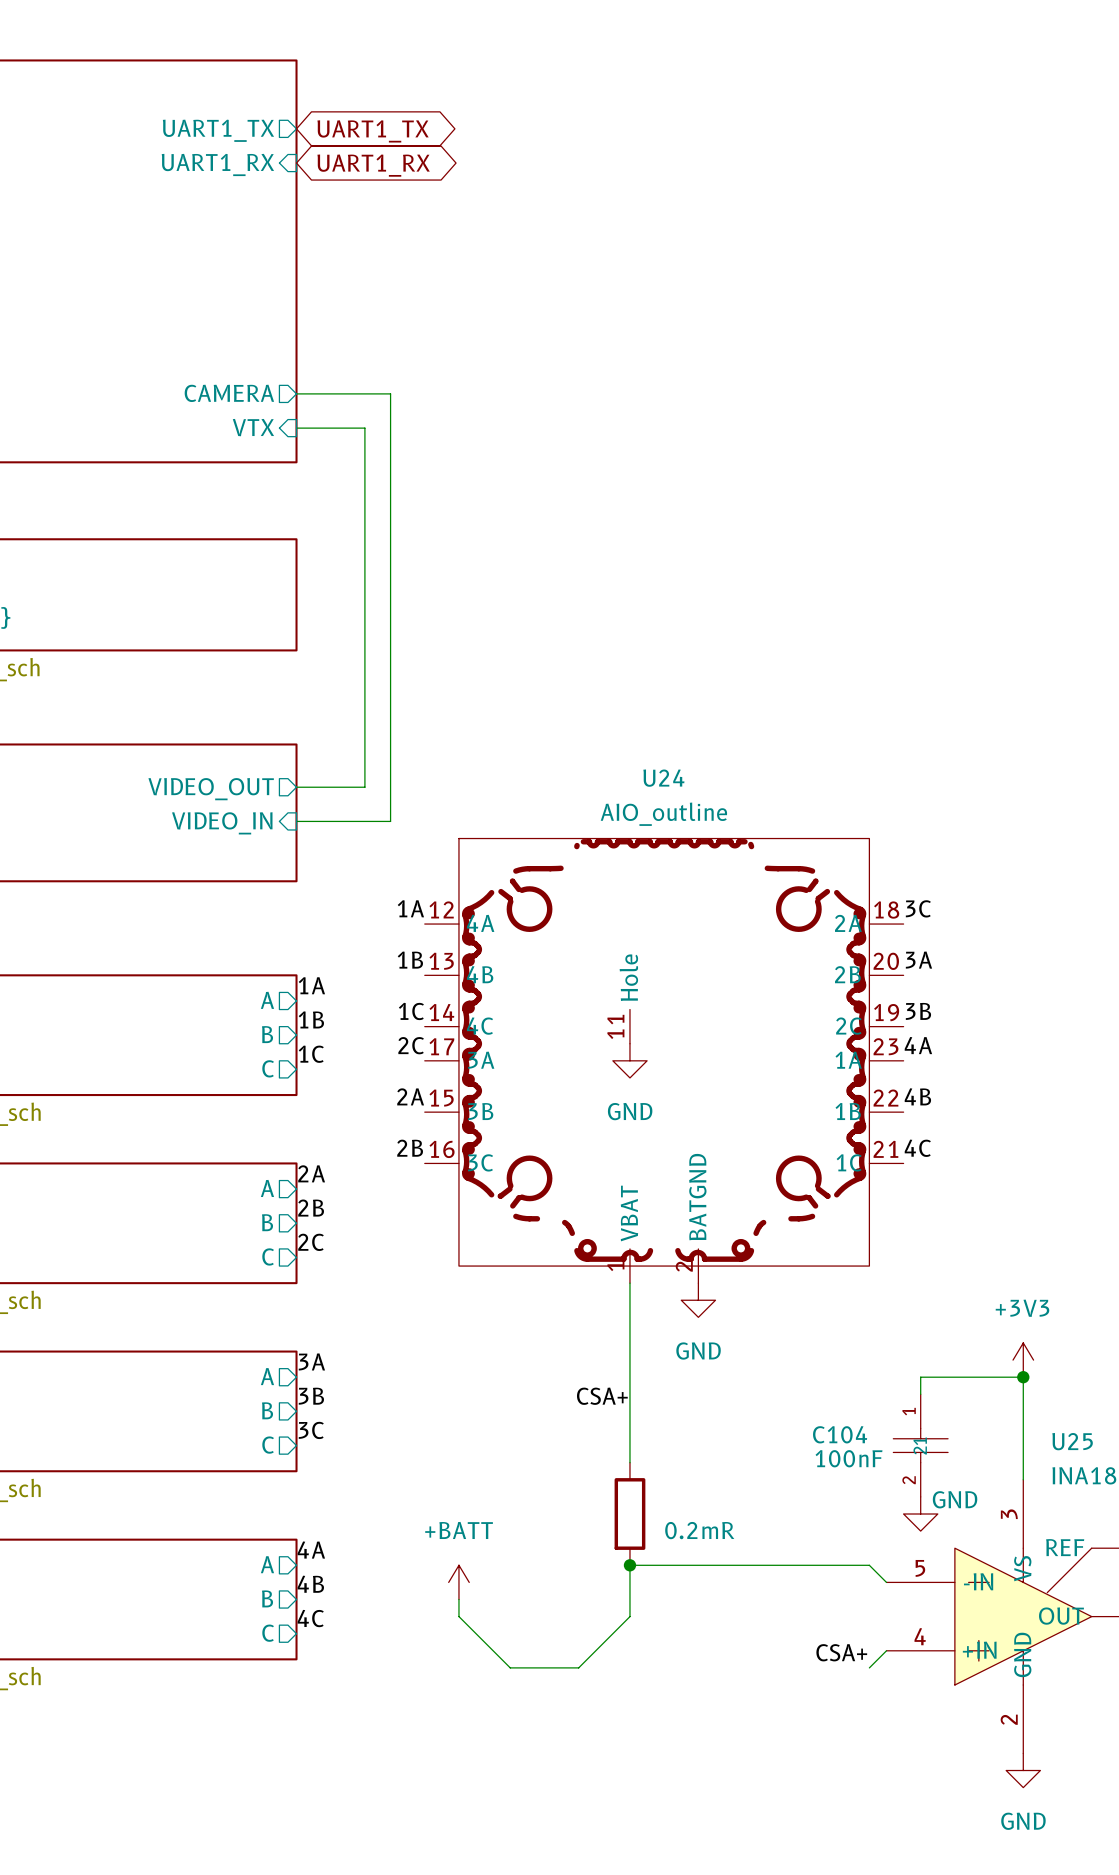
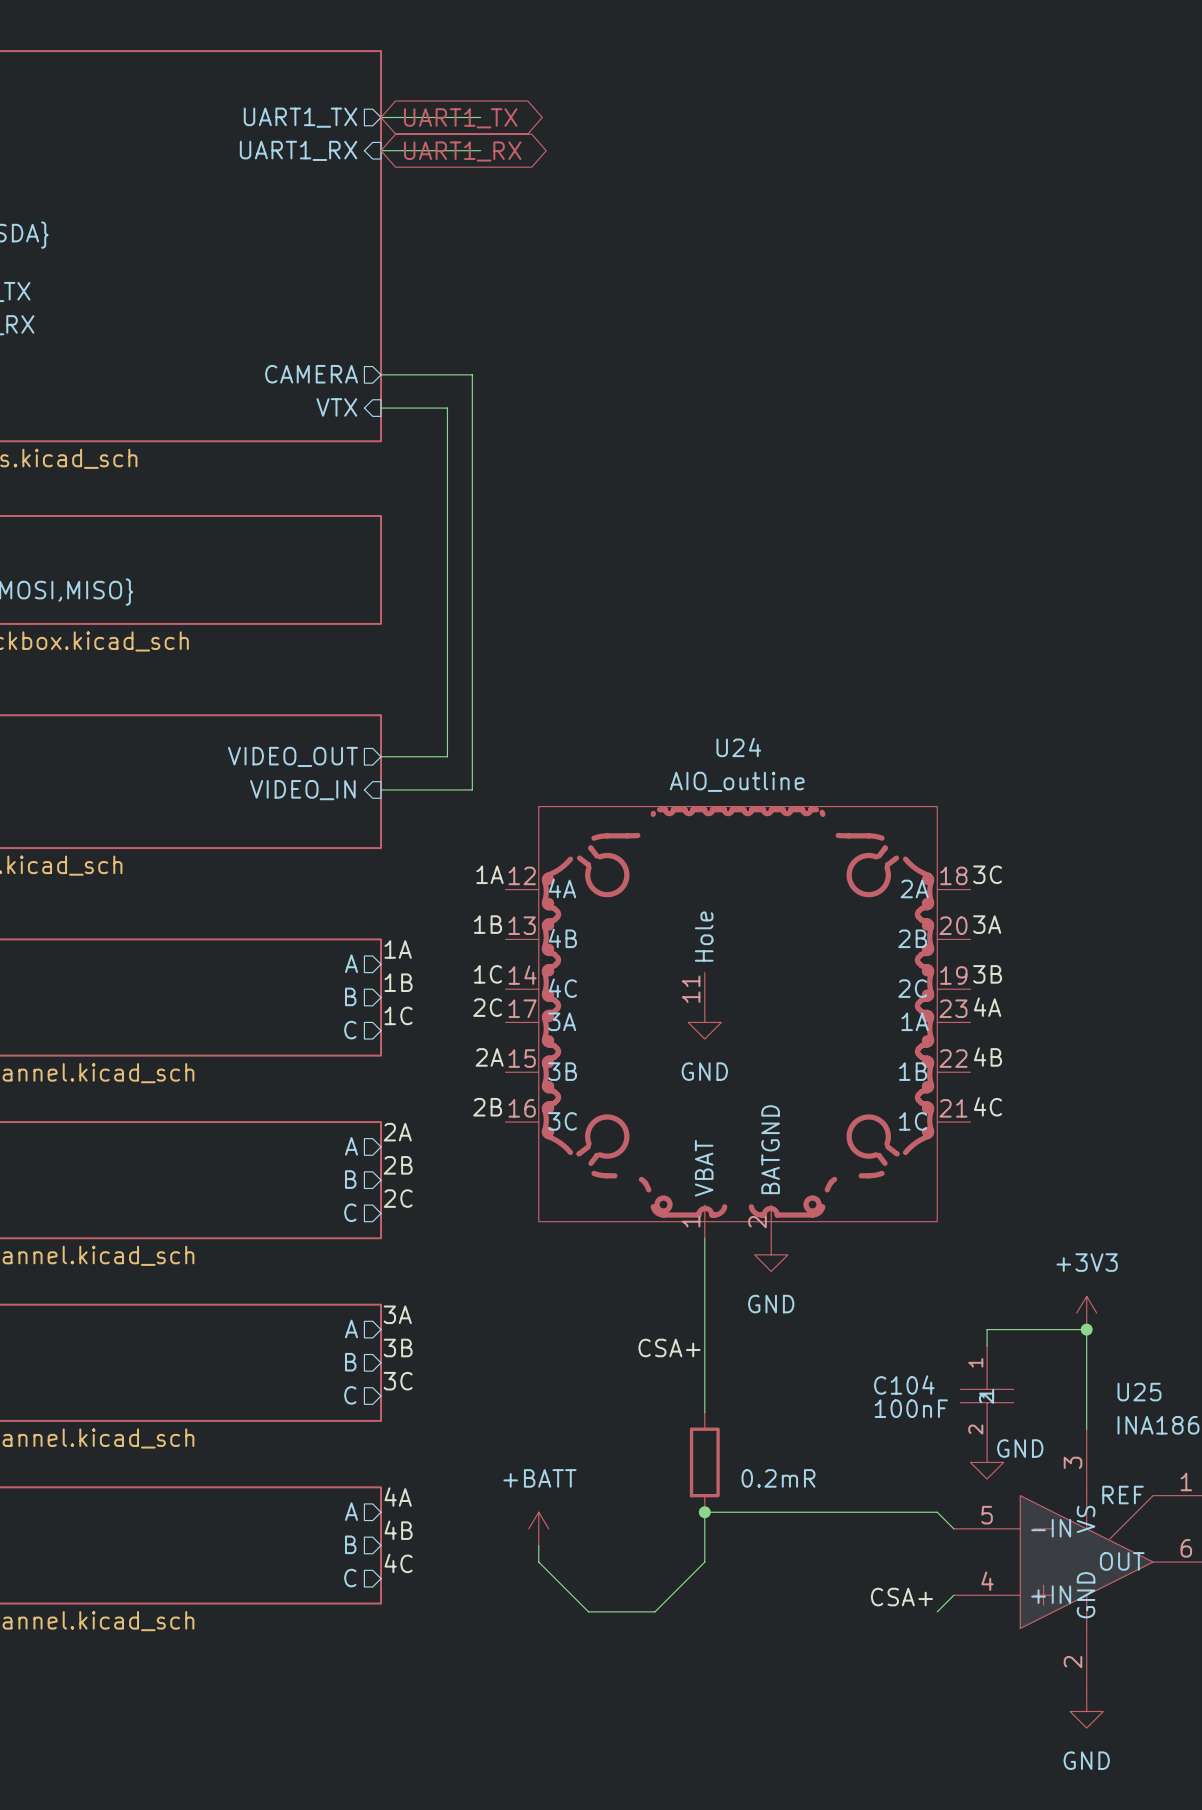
wire: none -> (381, 117) (480, 117)
wire: none -> (381, 150) (480, 150)

